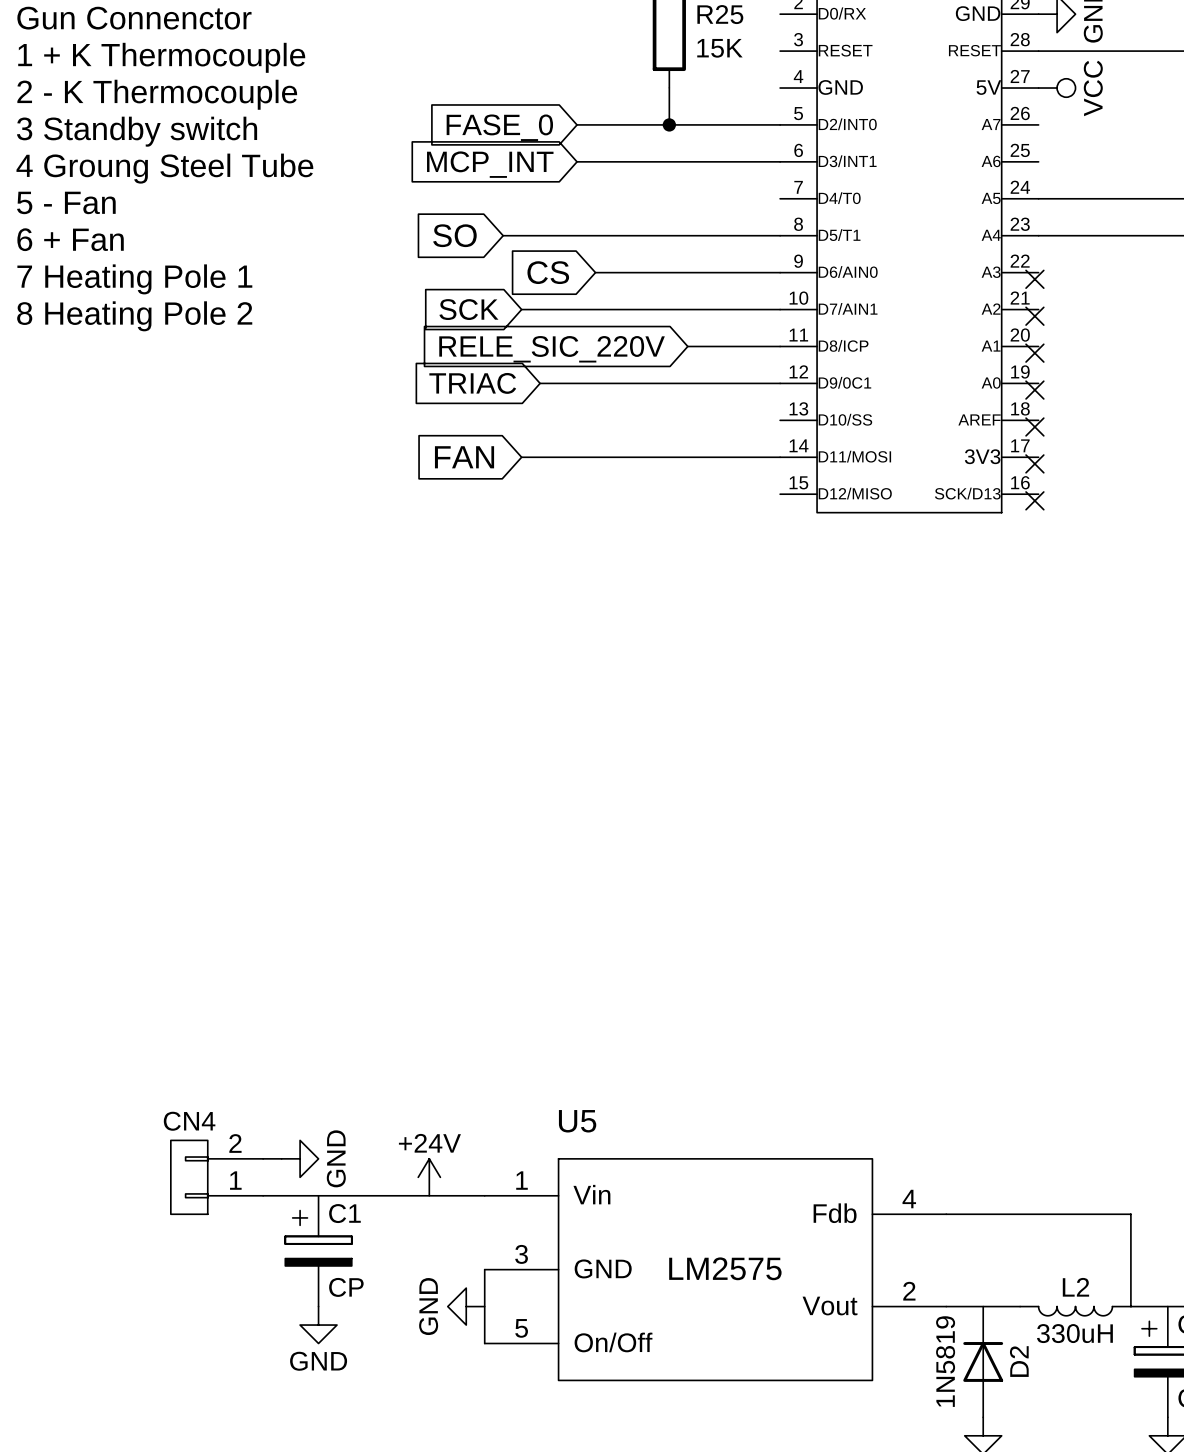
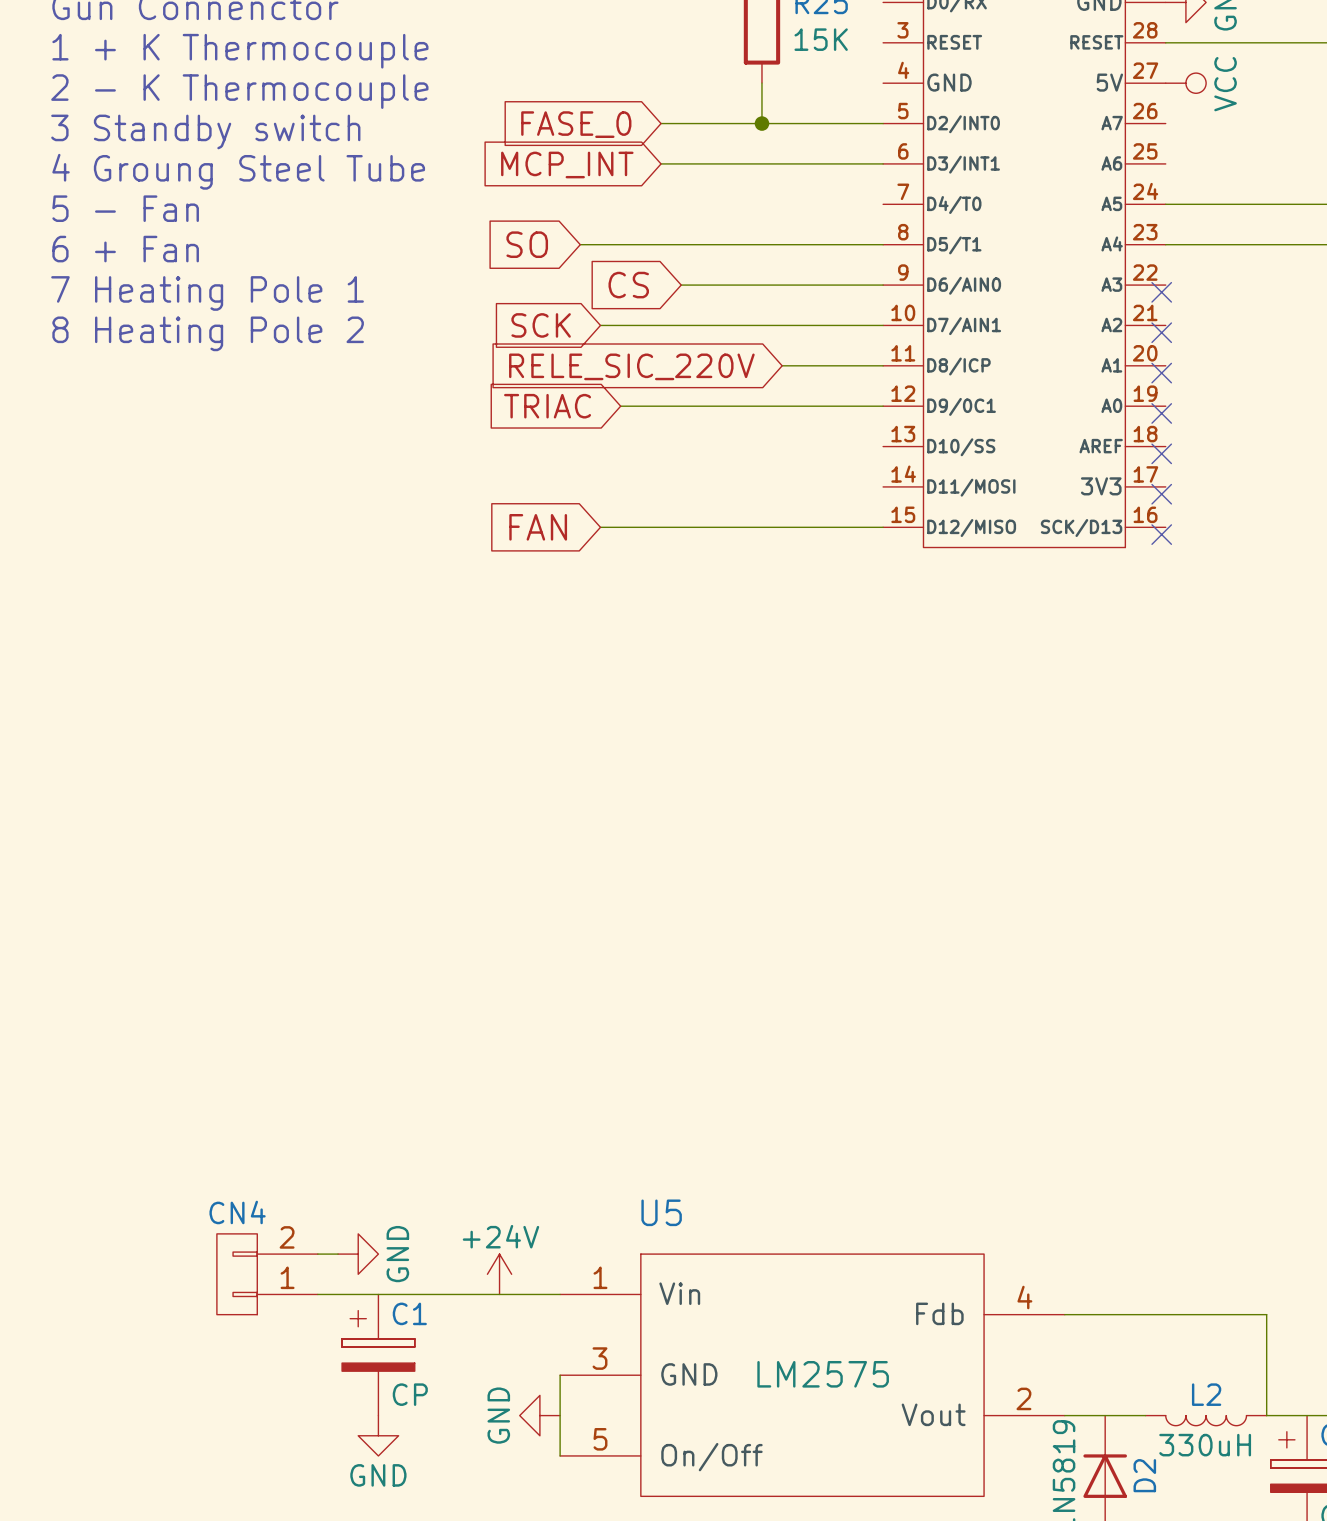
global label position: FAN (464, 457) -> FAN (538, 527)
wire: (521, 457) (780, 457) -> (600, 527) (883, 527)

